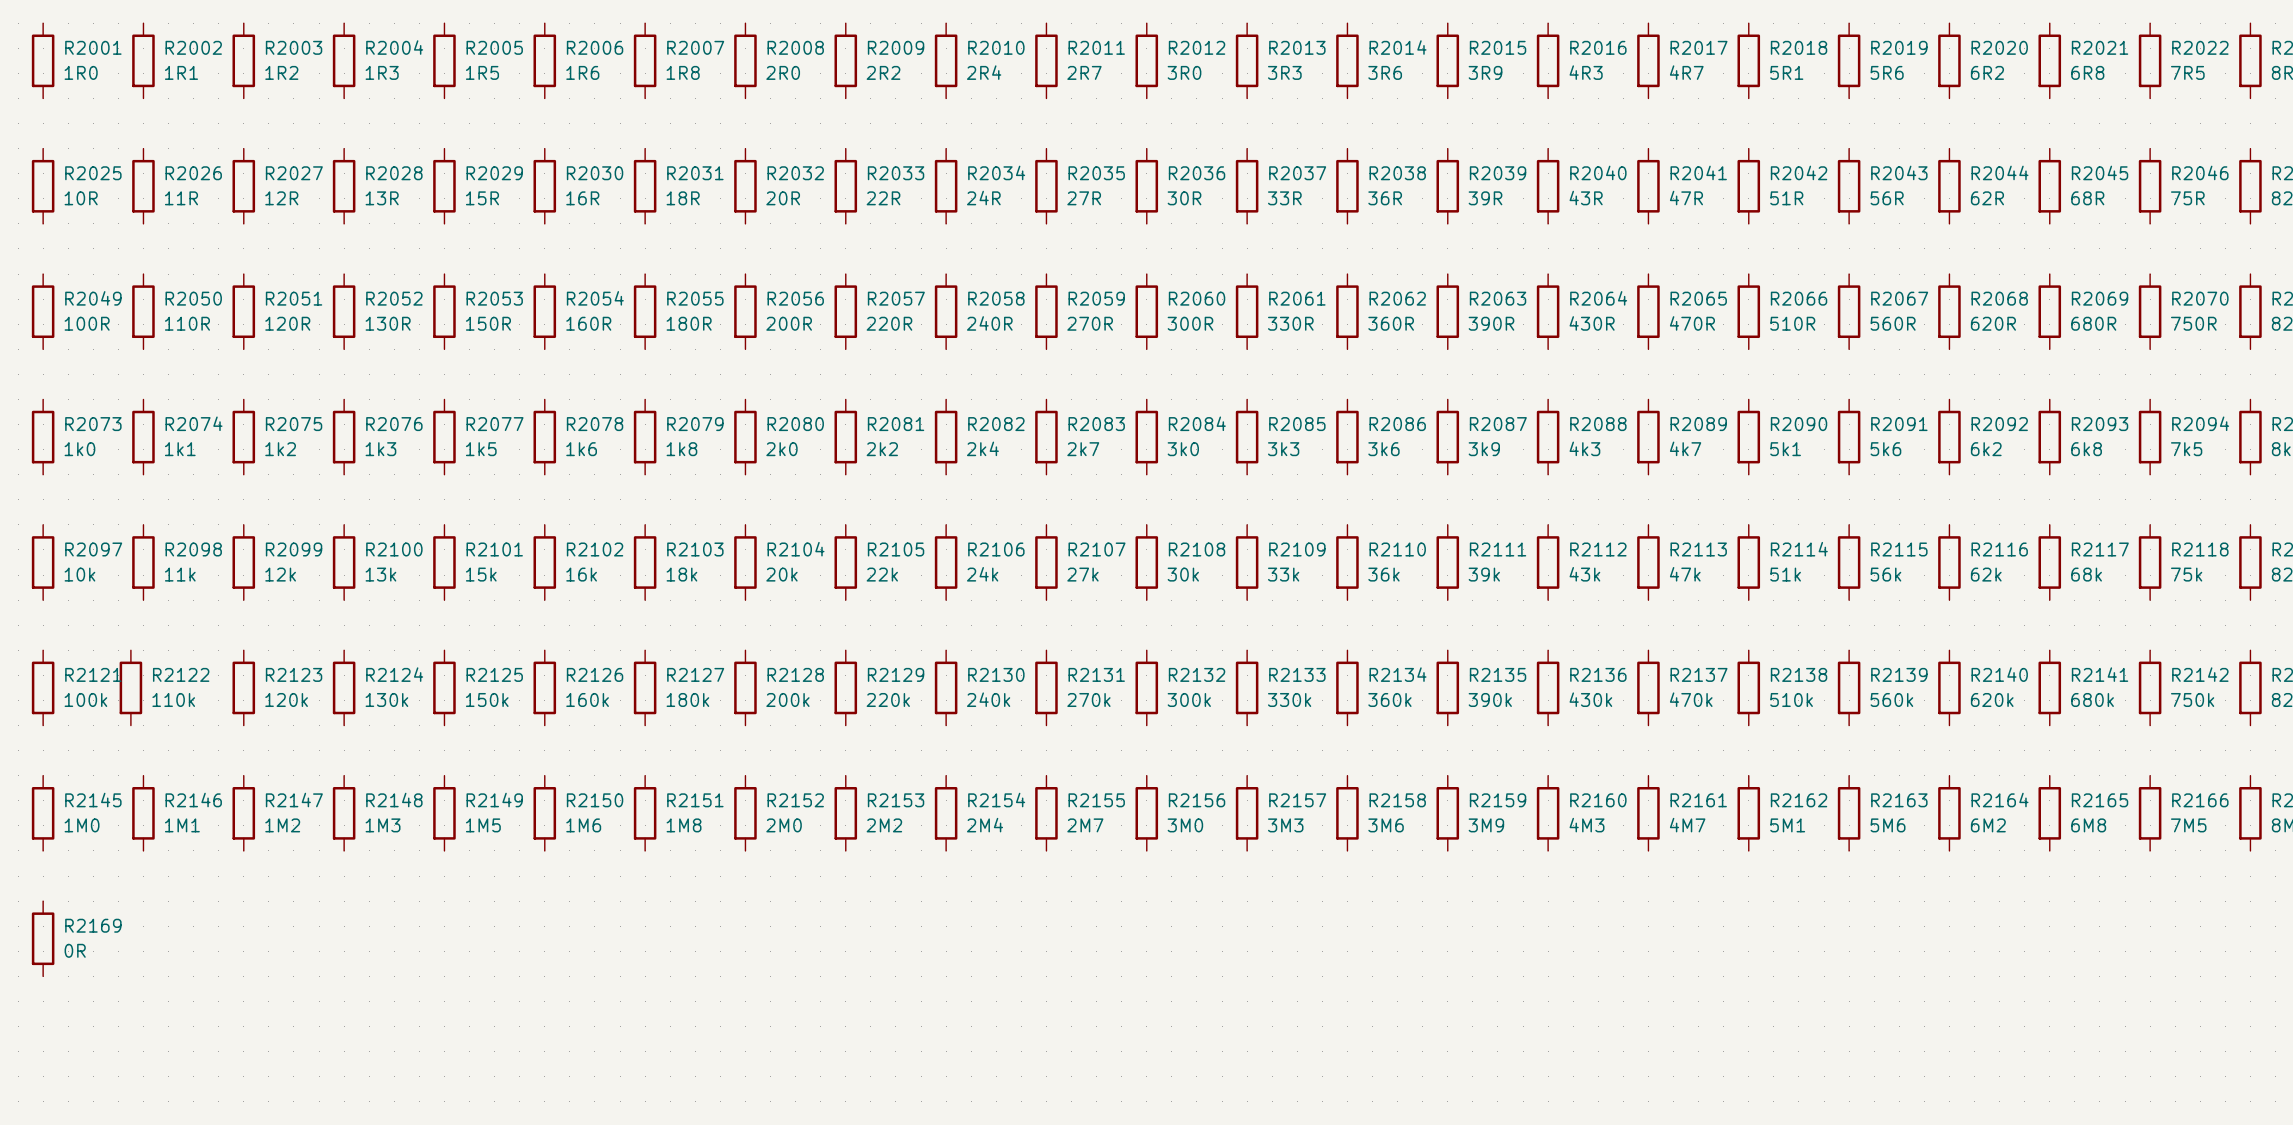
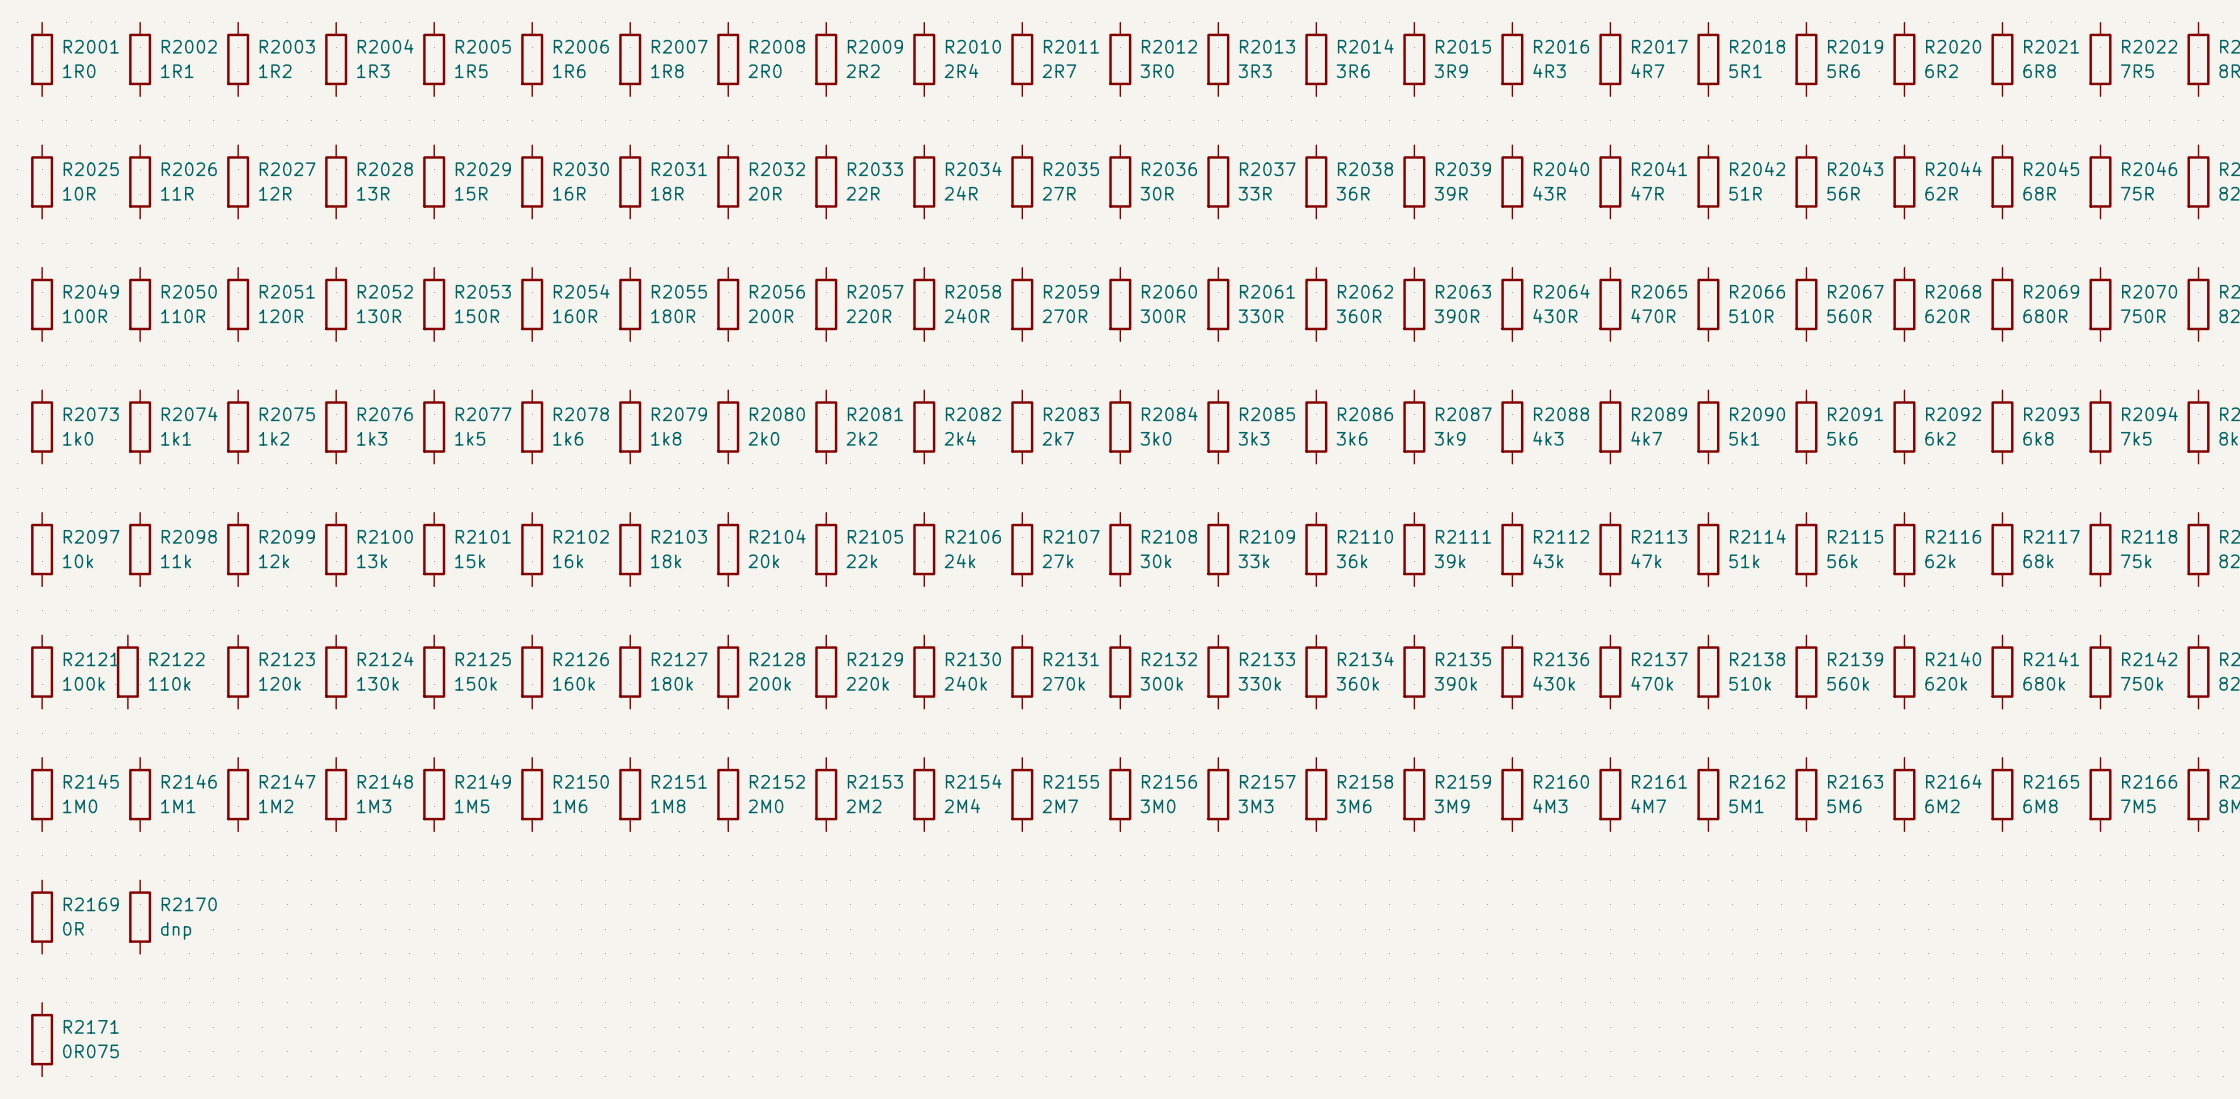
R2170: none -> dnp (140, 917)
R2171: none -> 0R075 (42, 1039)

